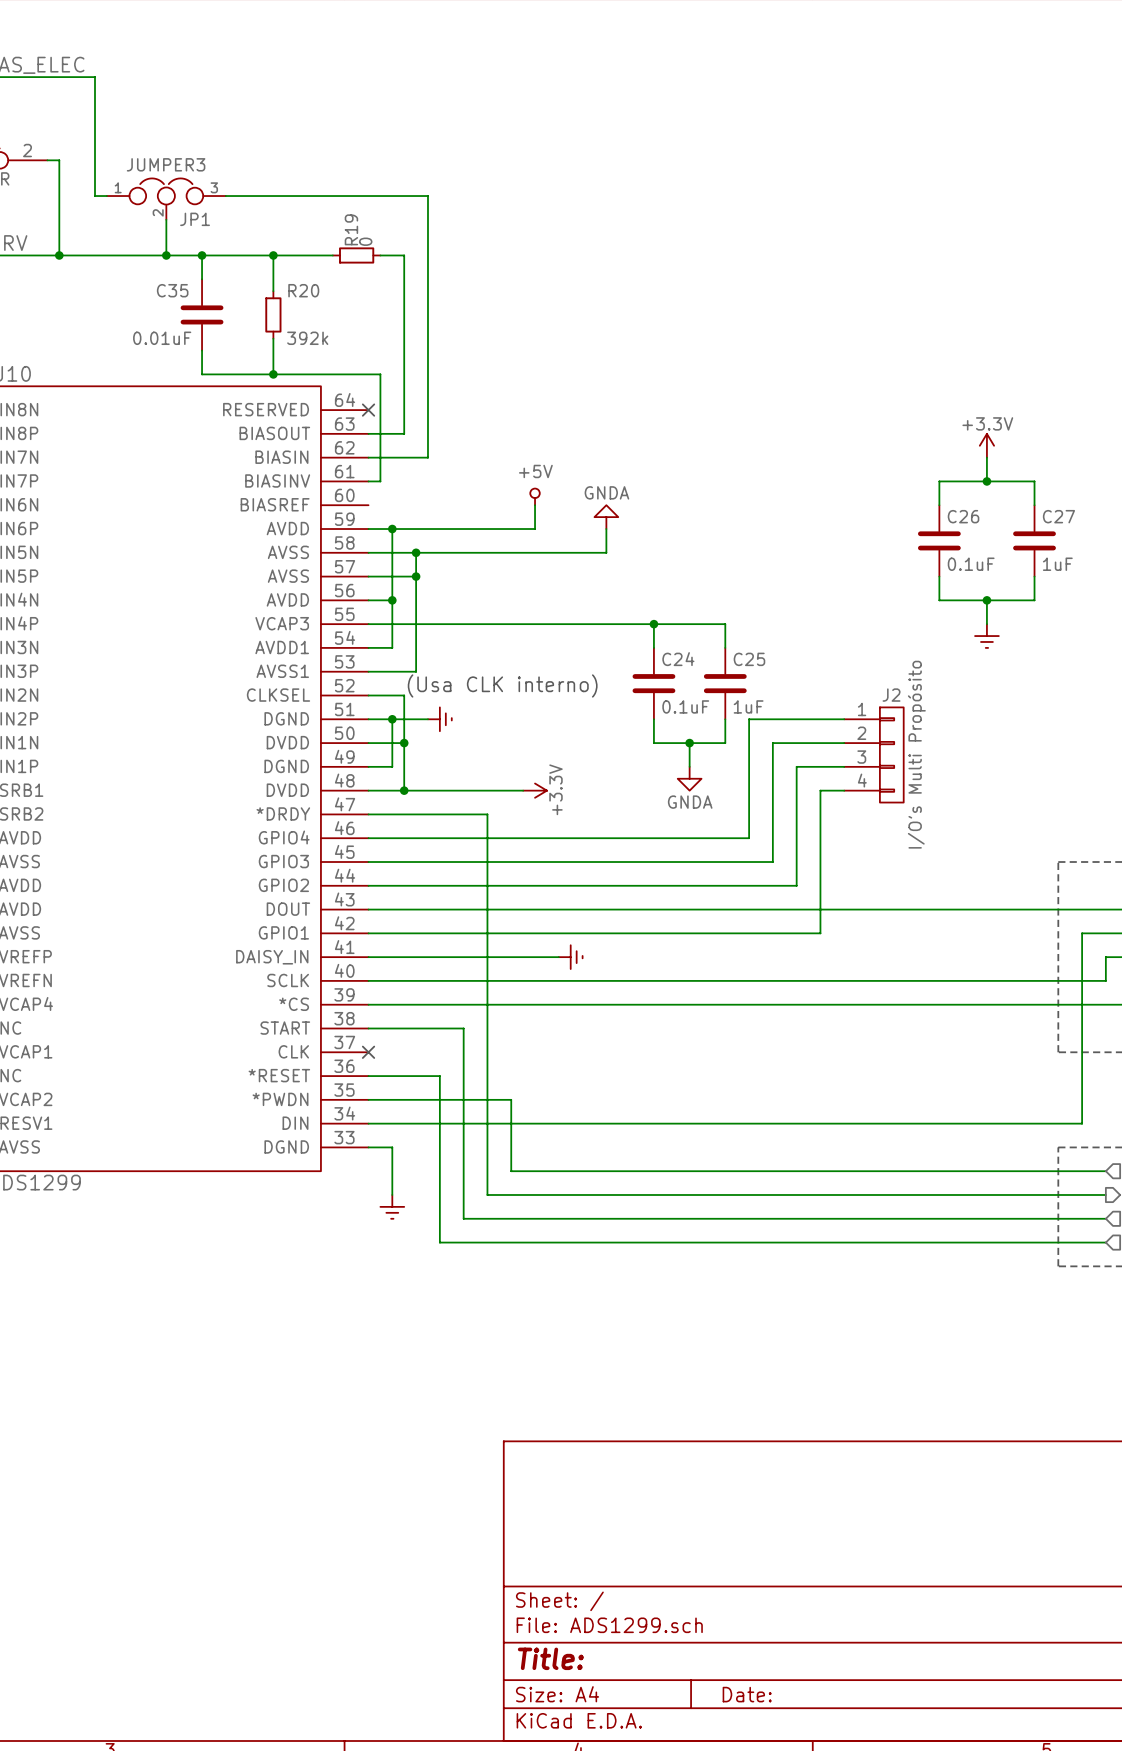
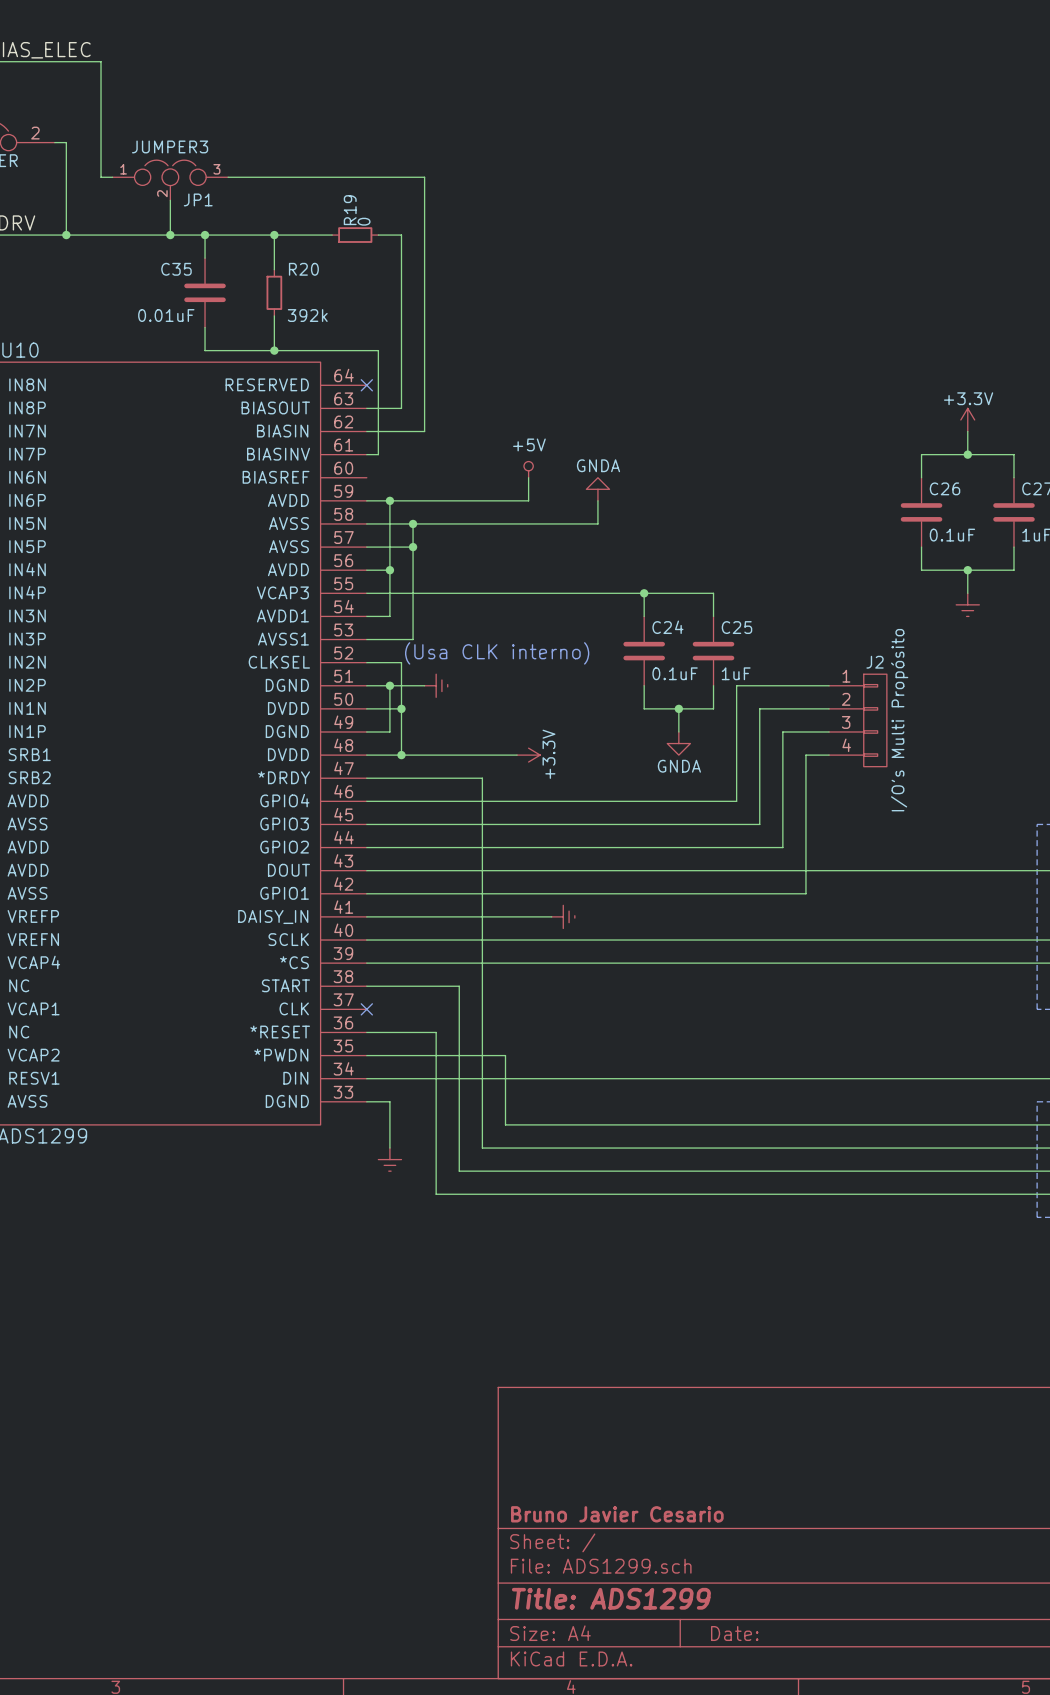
title block: none -> Bruno Javier Cesario (617, 1514)
title block: Title: (550, 1658) -> Title: ADS1299 (611, 1598)

